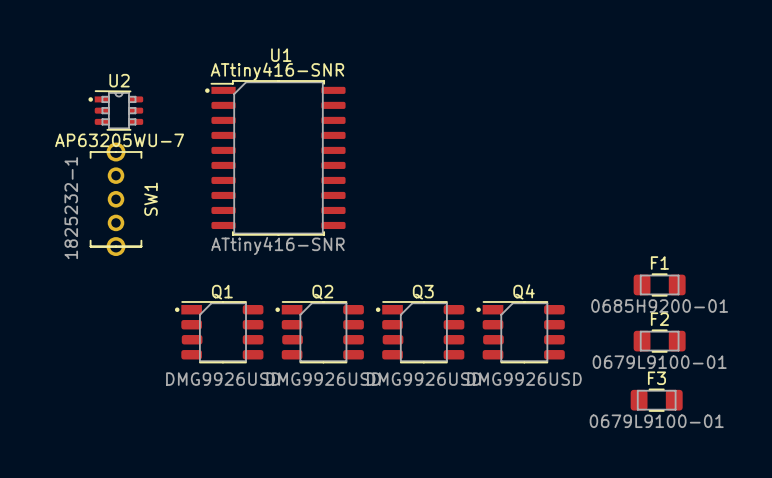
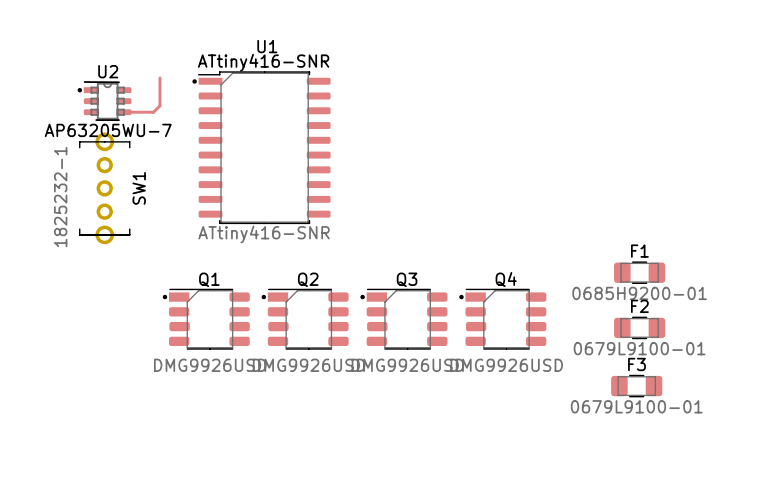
top track: none -> (159, 77) (159, 105) (153, 112) (124, 112)

